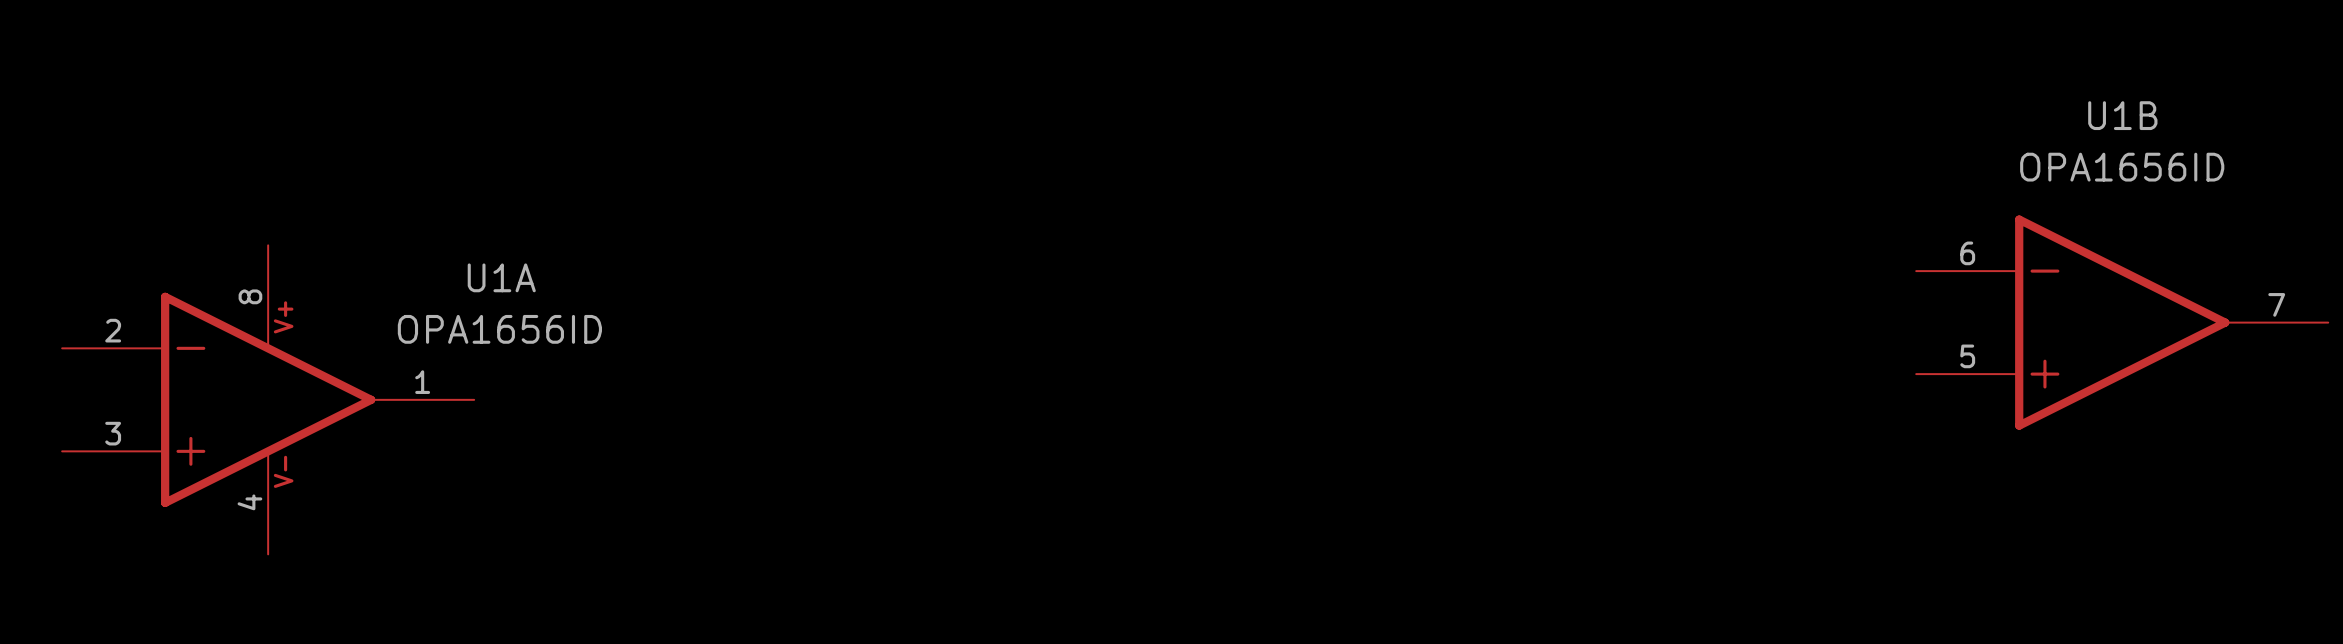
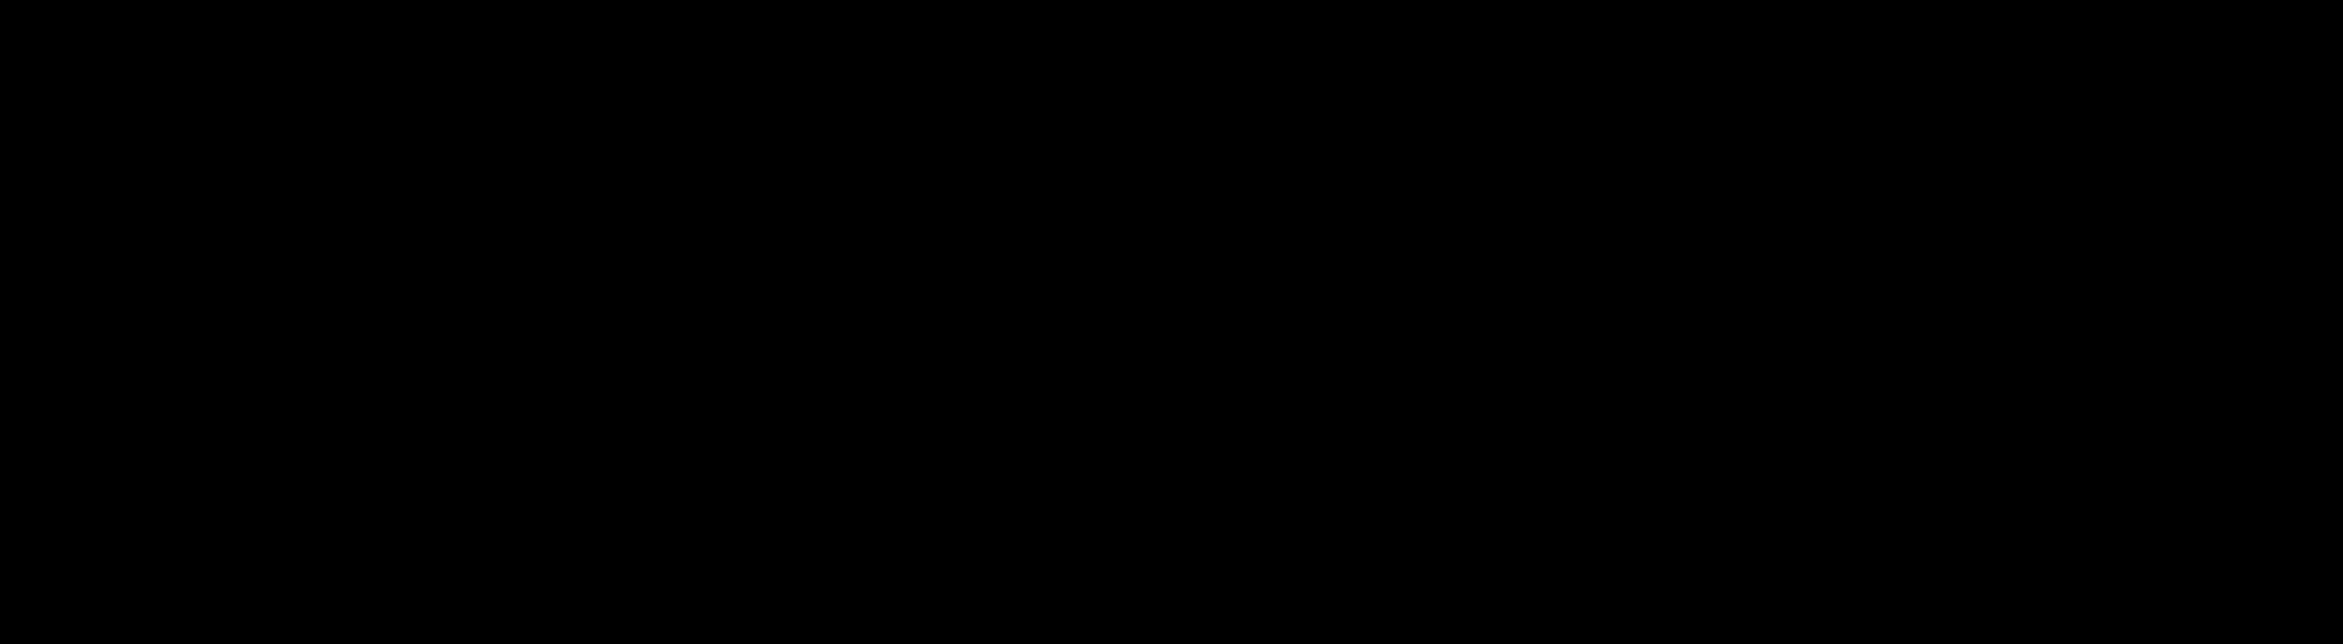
U1B: OPA1656ID (2122, 322) -> none
U1A: OPA1656ID (268, 399) -> none

